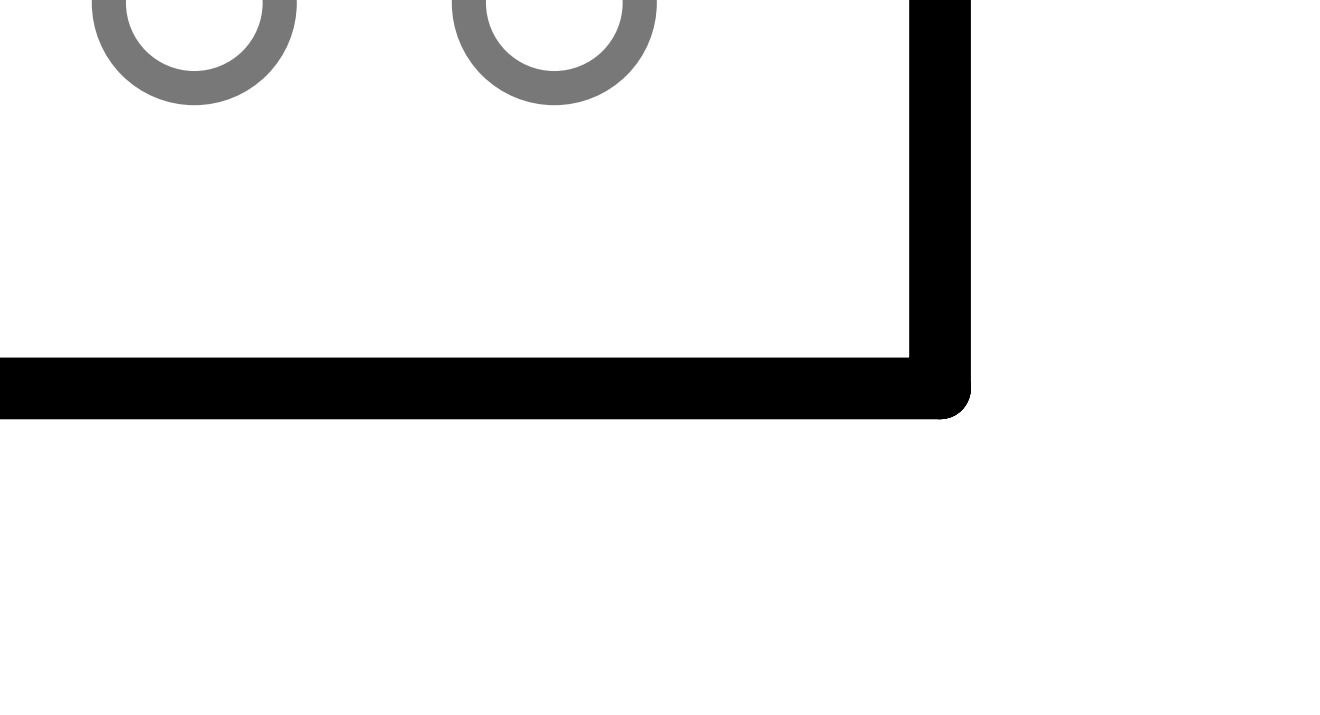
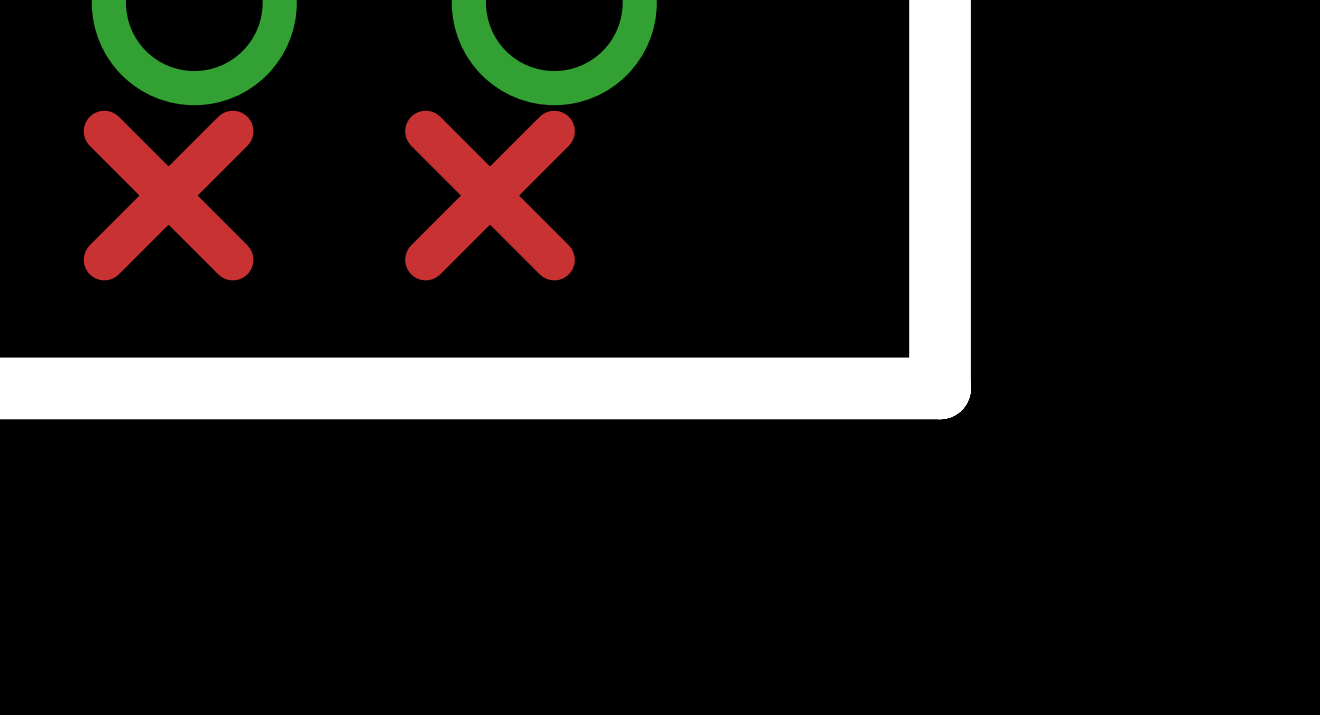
top track: none -> (104, 131) (232, 259)
top track: none -> (232, 131) (104, 259)
top track: none -> (425, 131) (554, 259)
top track: none -> (554, 131) (425, 259)

